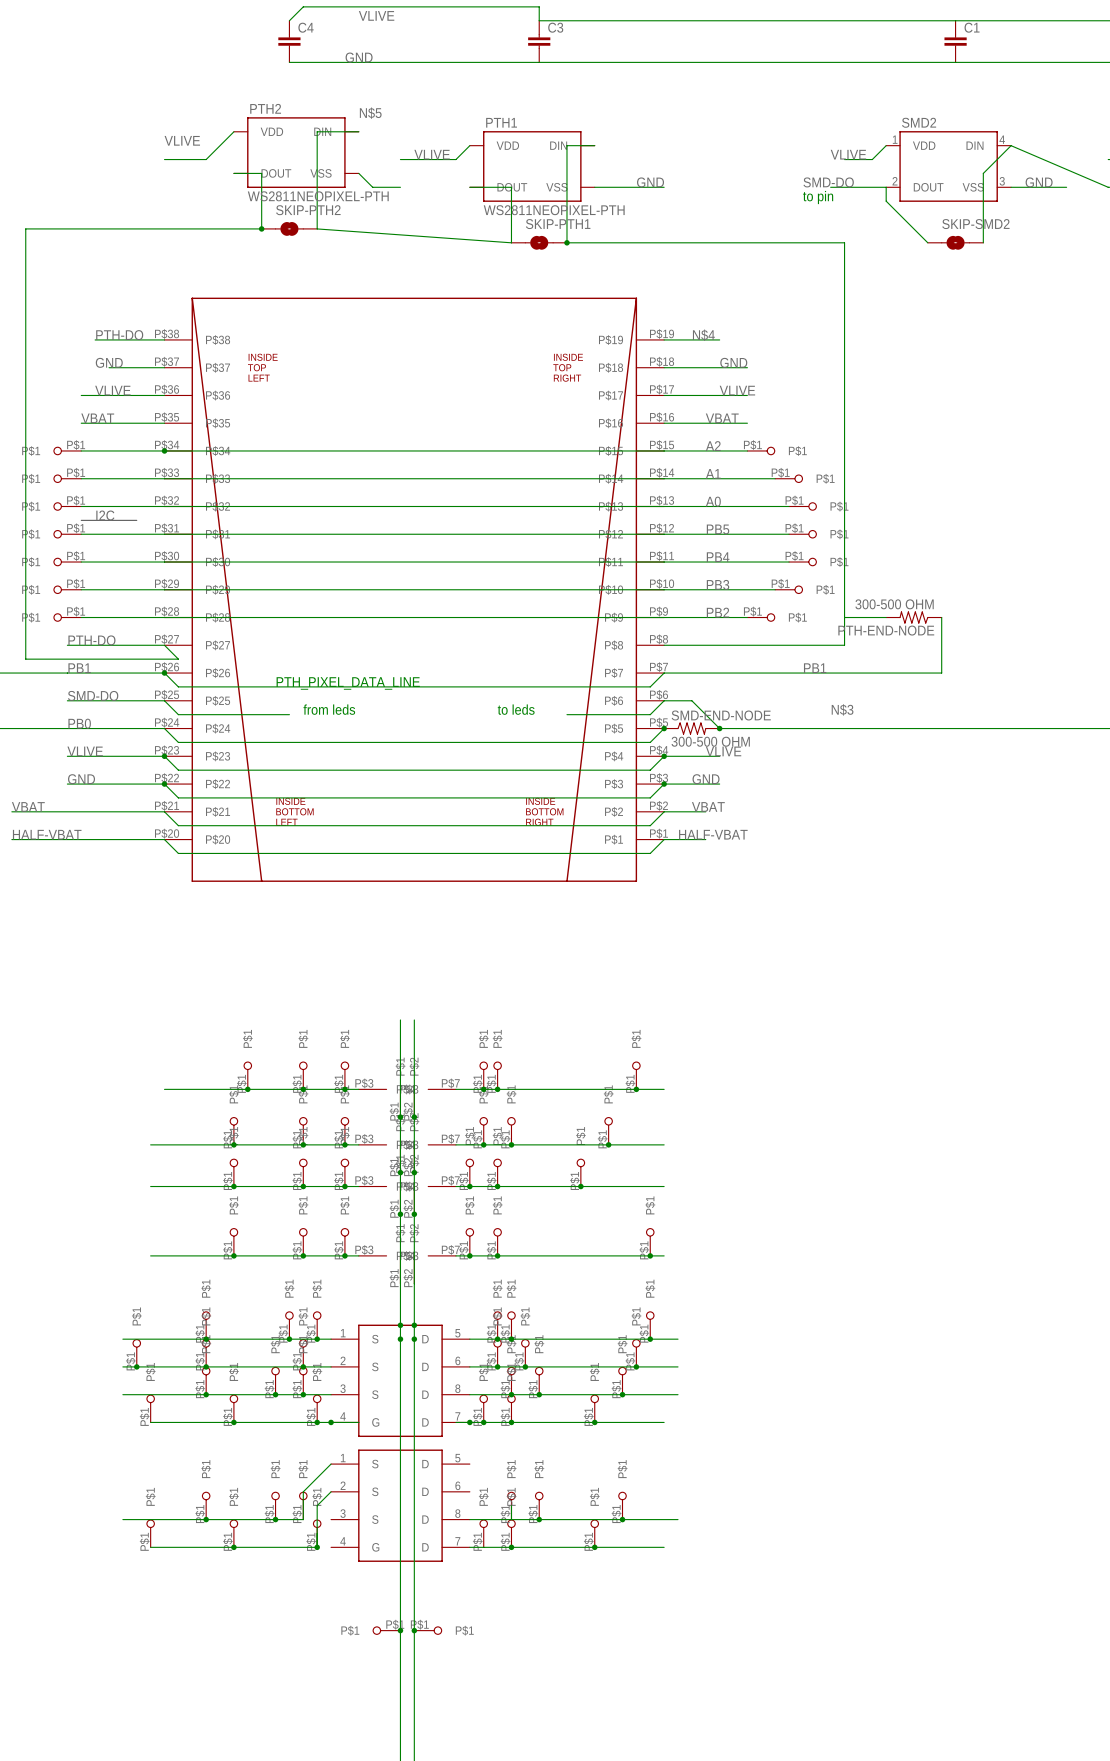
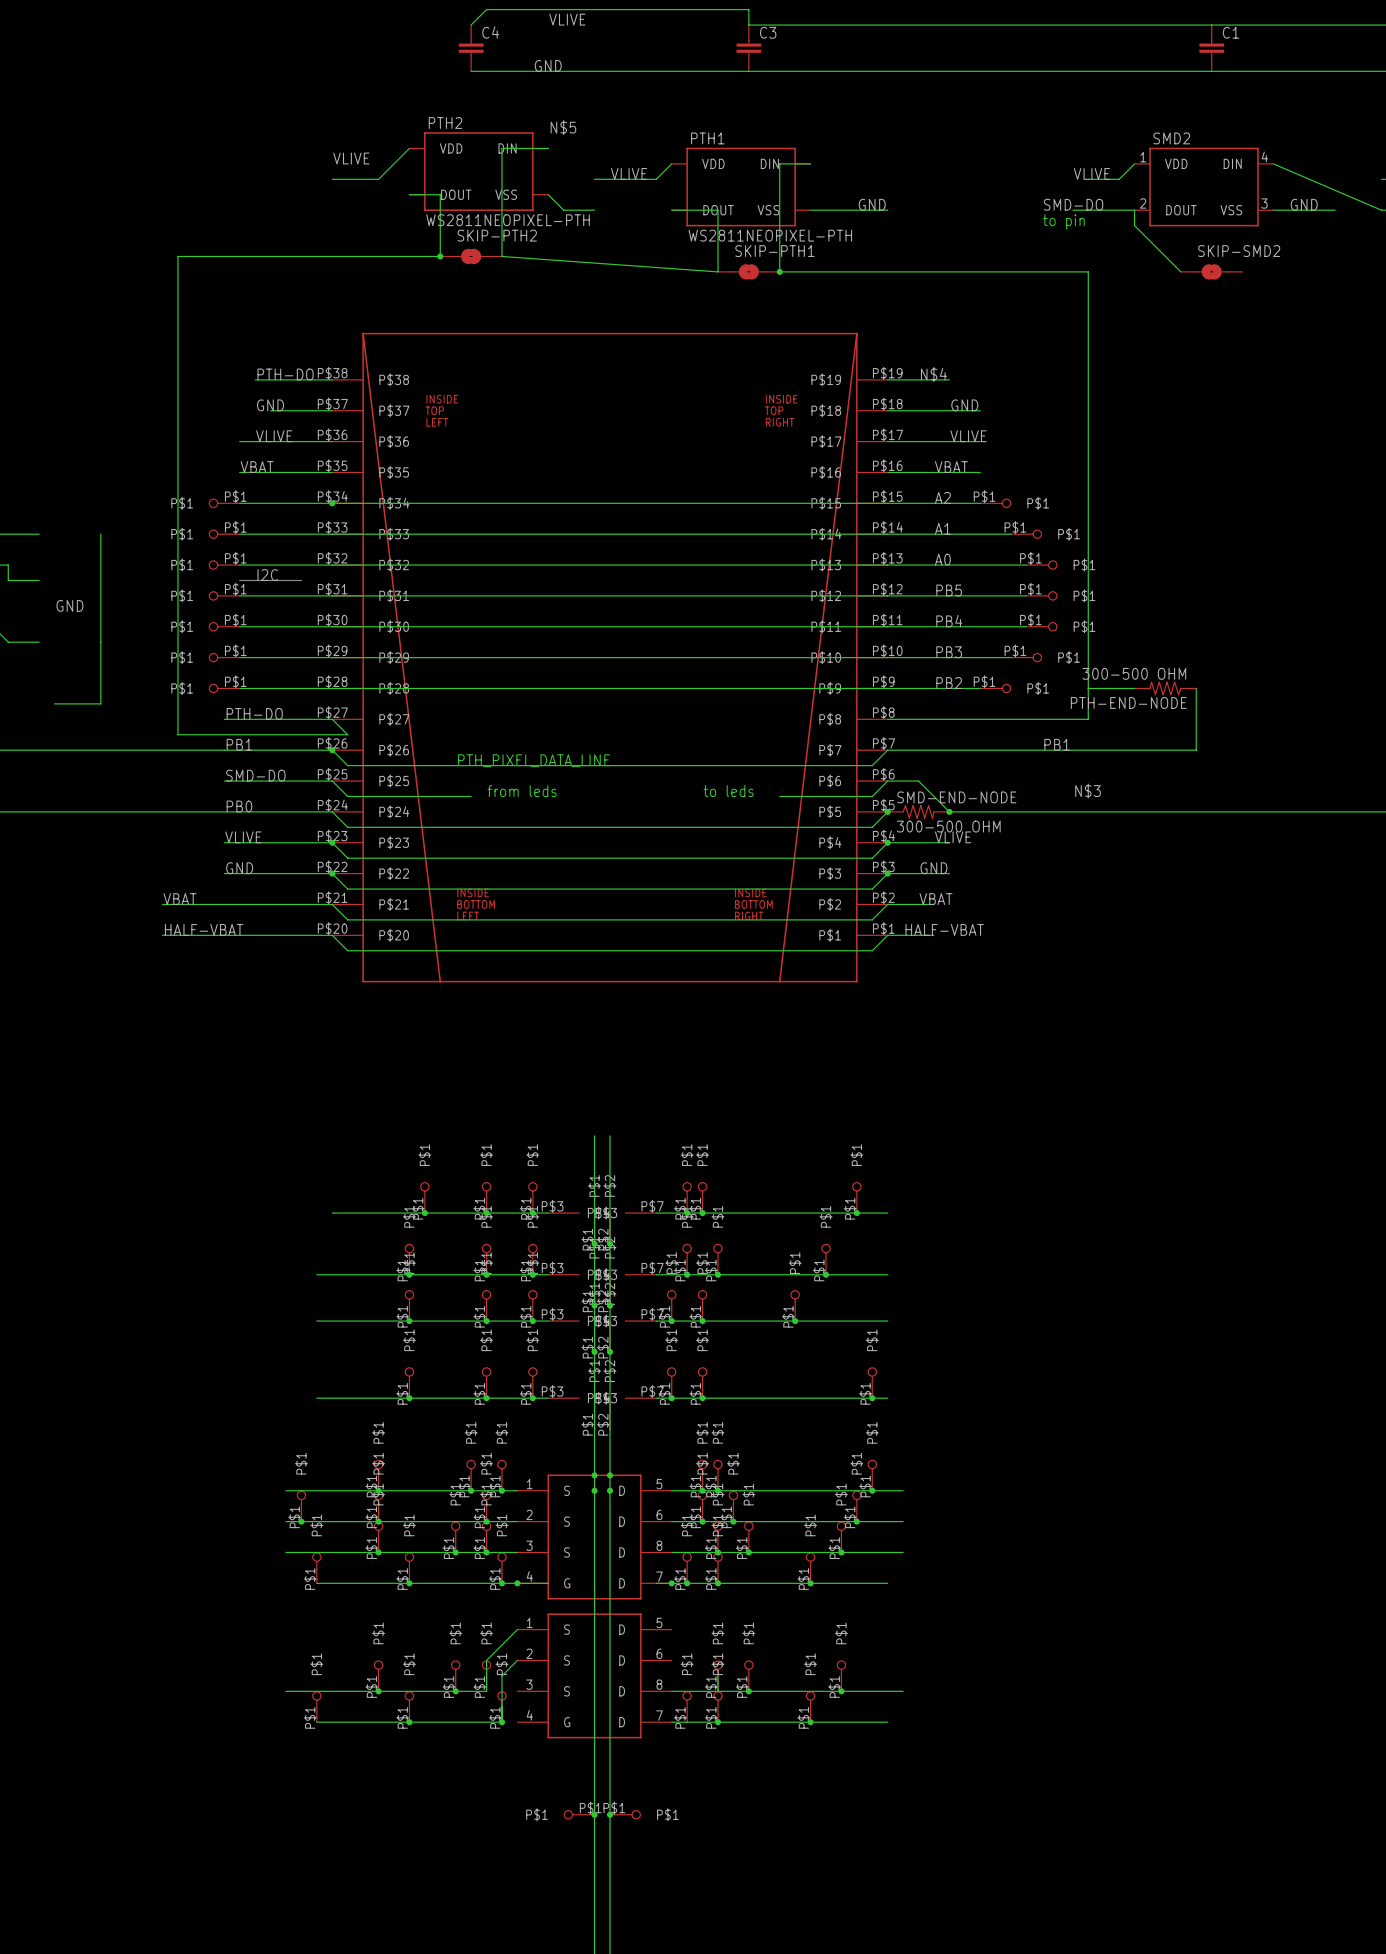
wire: (1011, 145) (983, 173) (983, 242) -> none

